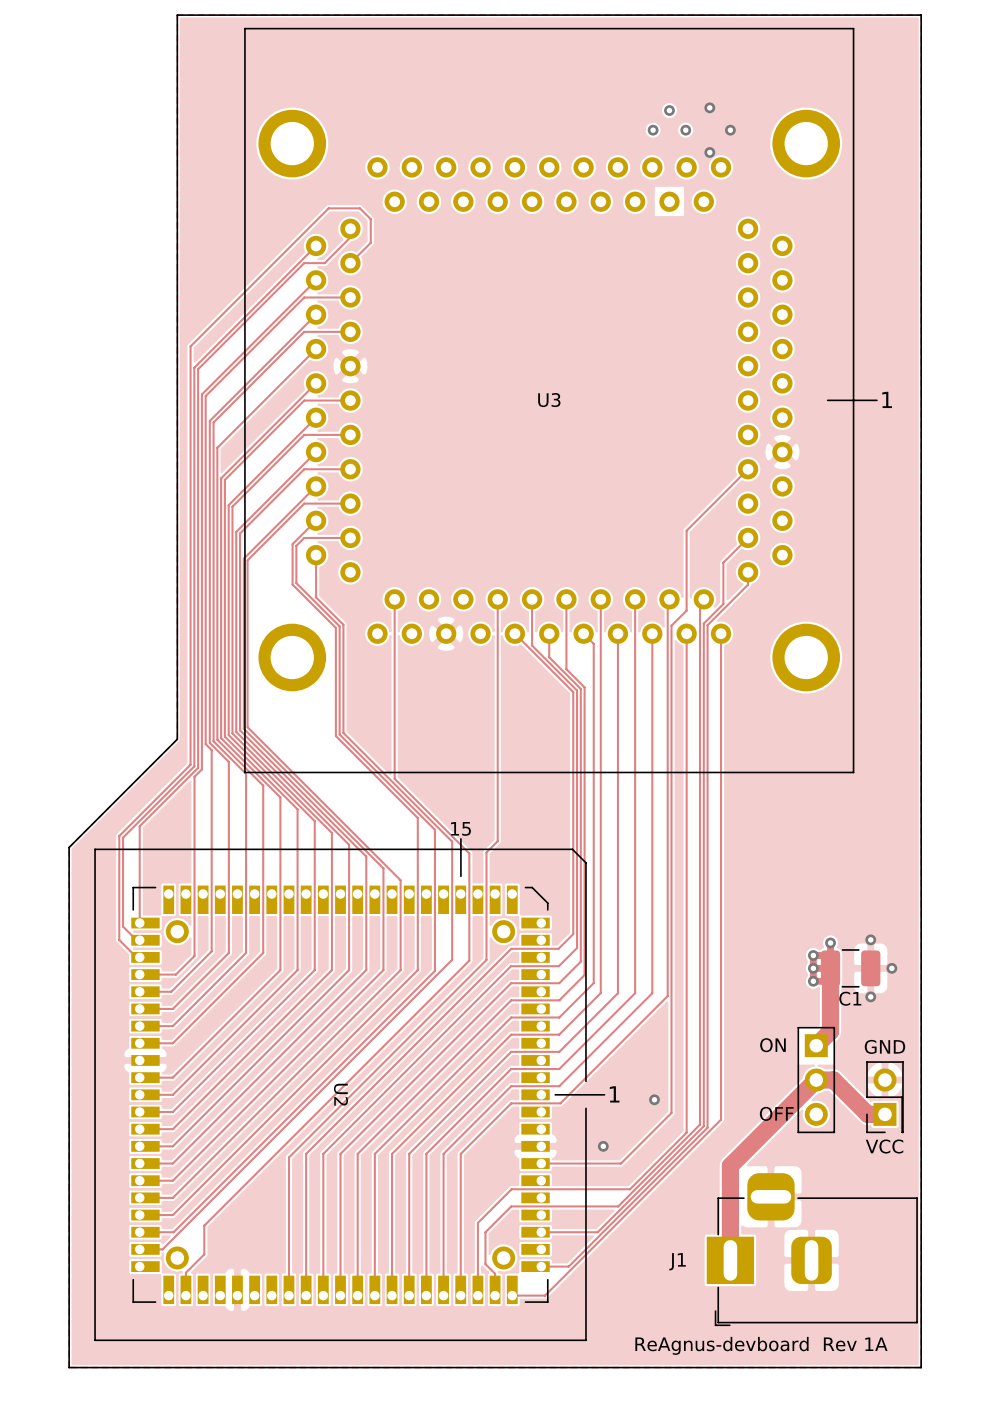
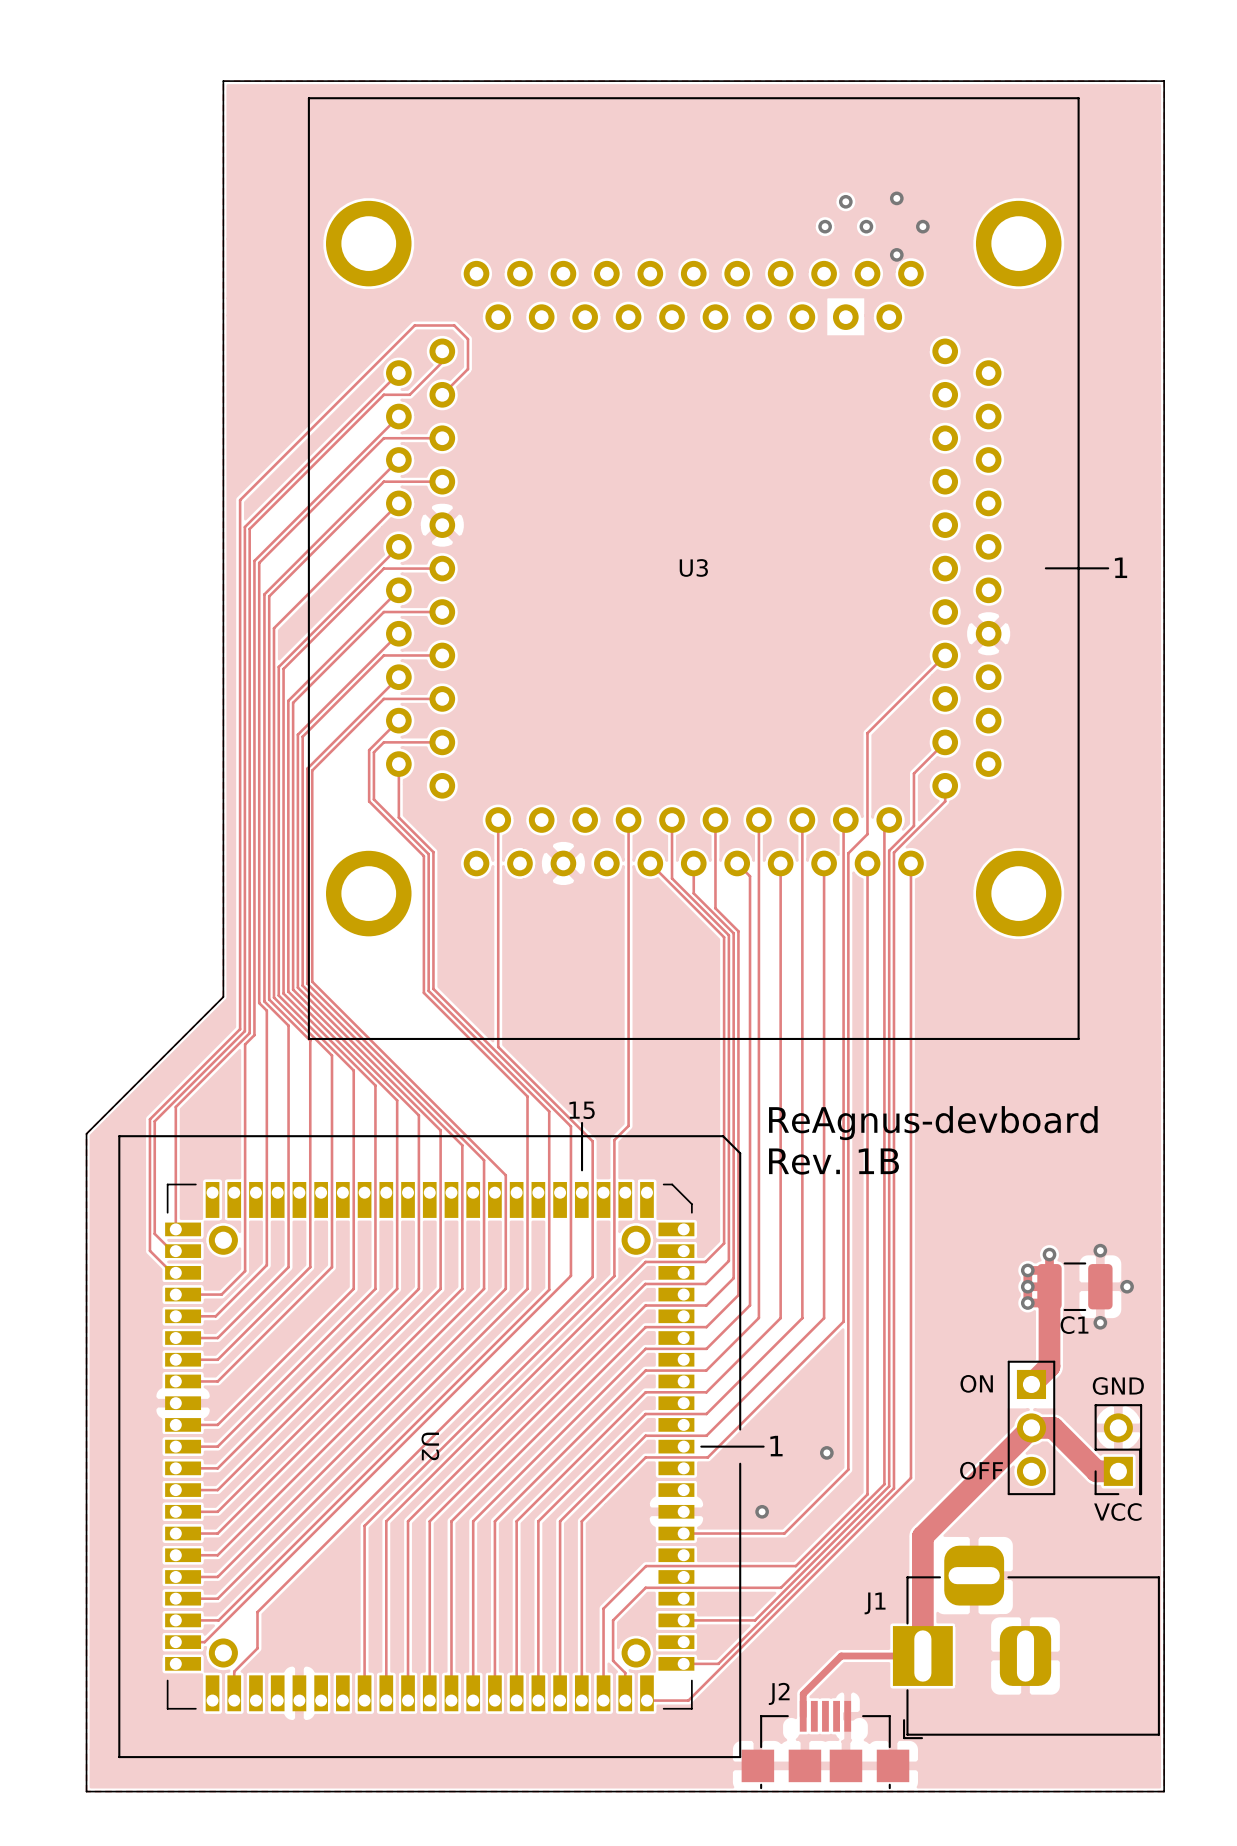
text: none -> ReAgnus-devboard (933, 1123)
text: none -> Rev. 1B (833, 1161)
track: none -> (922, 1656) (841, 1656) (803, 1694) (803, 1716)
J1 name position: J1 (677, 1261) -> J1 (875, 1603)
J2: none -> (825, 1745)
text: ReAgnus-devboard Rev 1A (761, 1345) -> none

